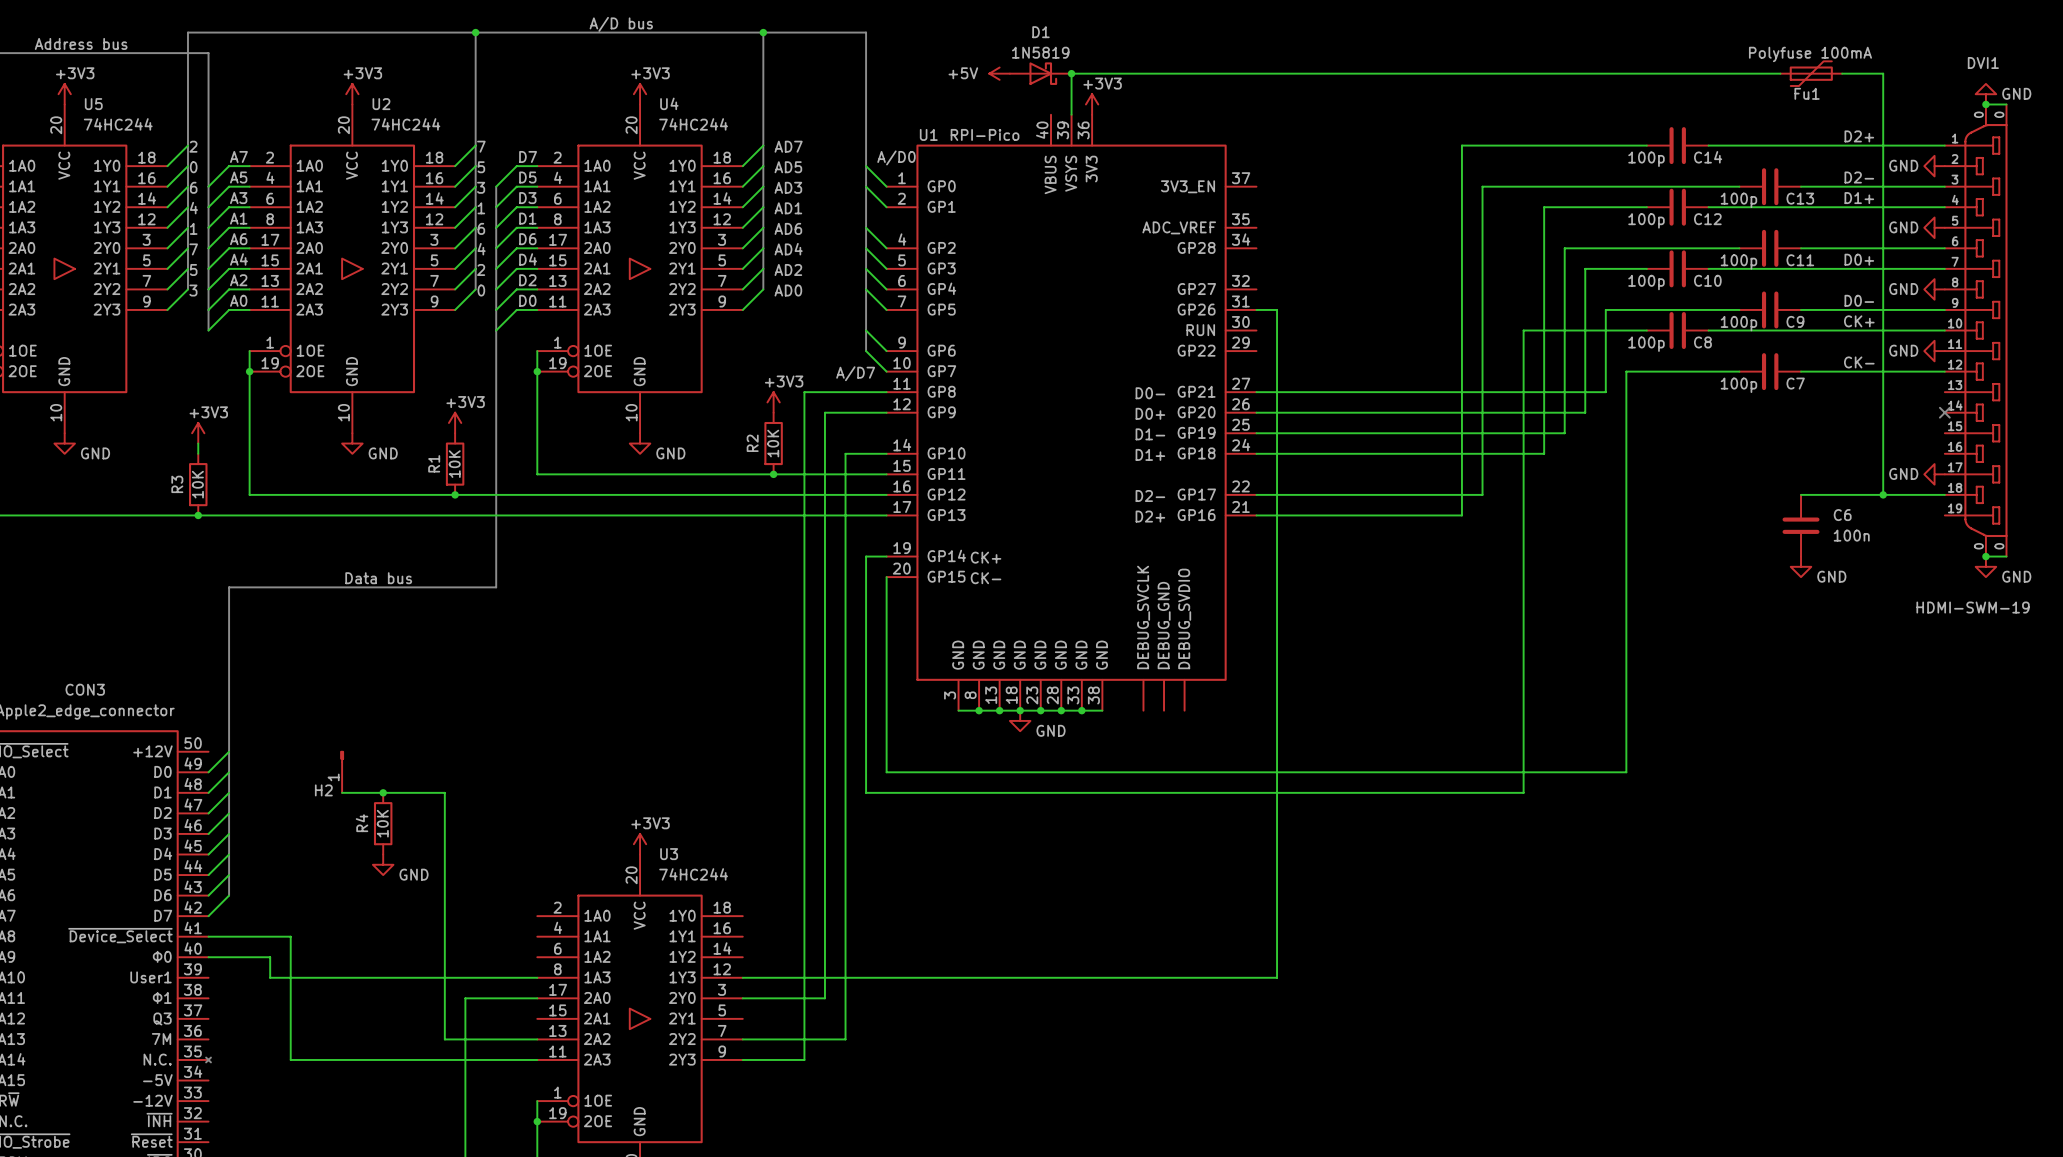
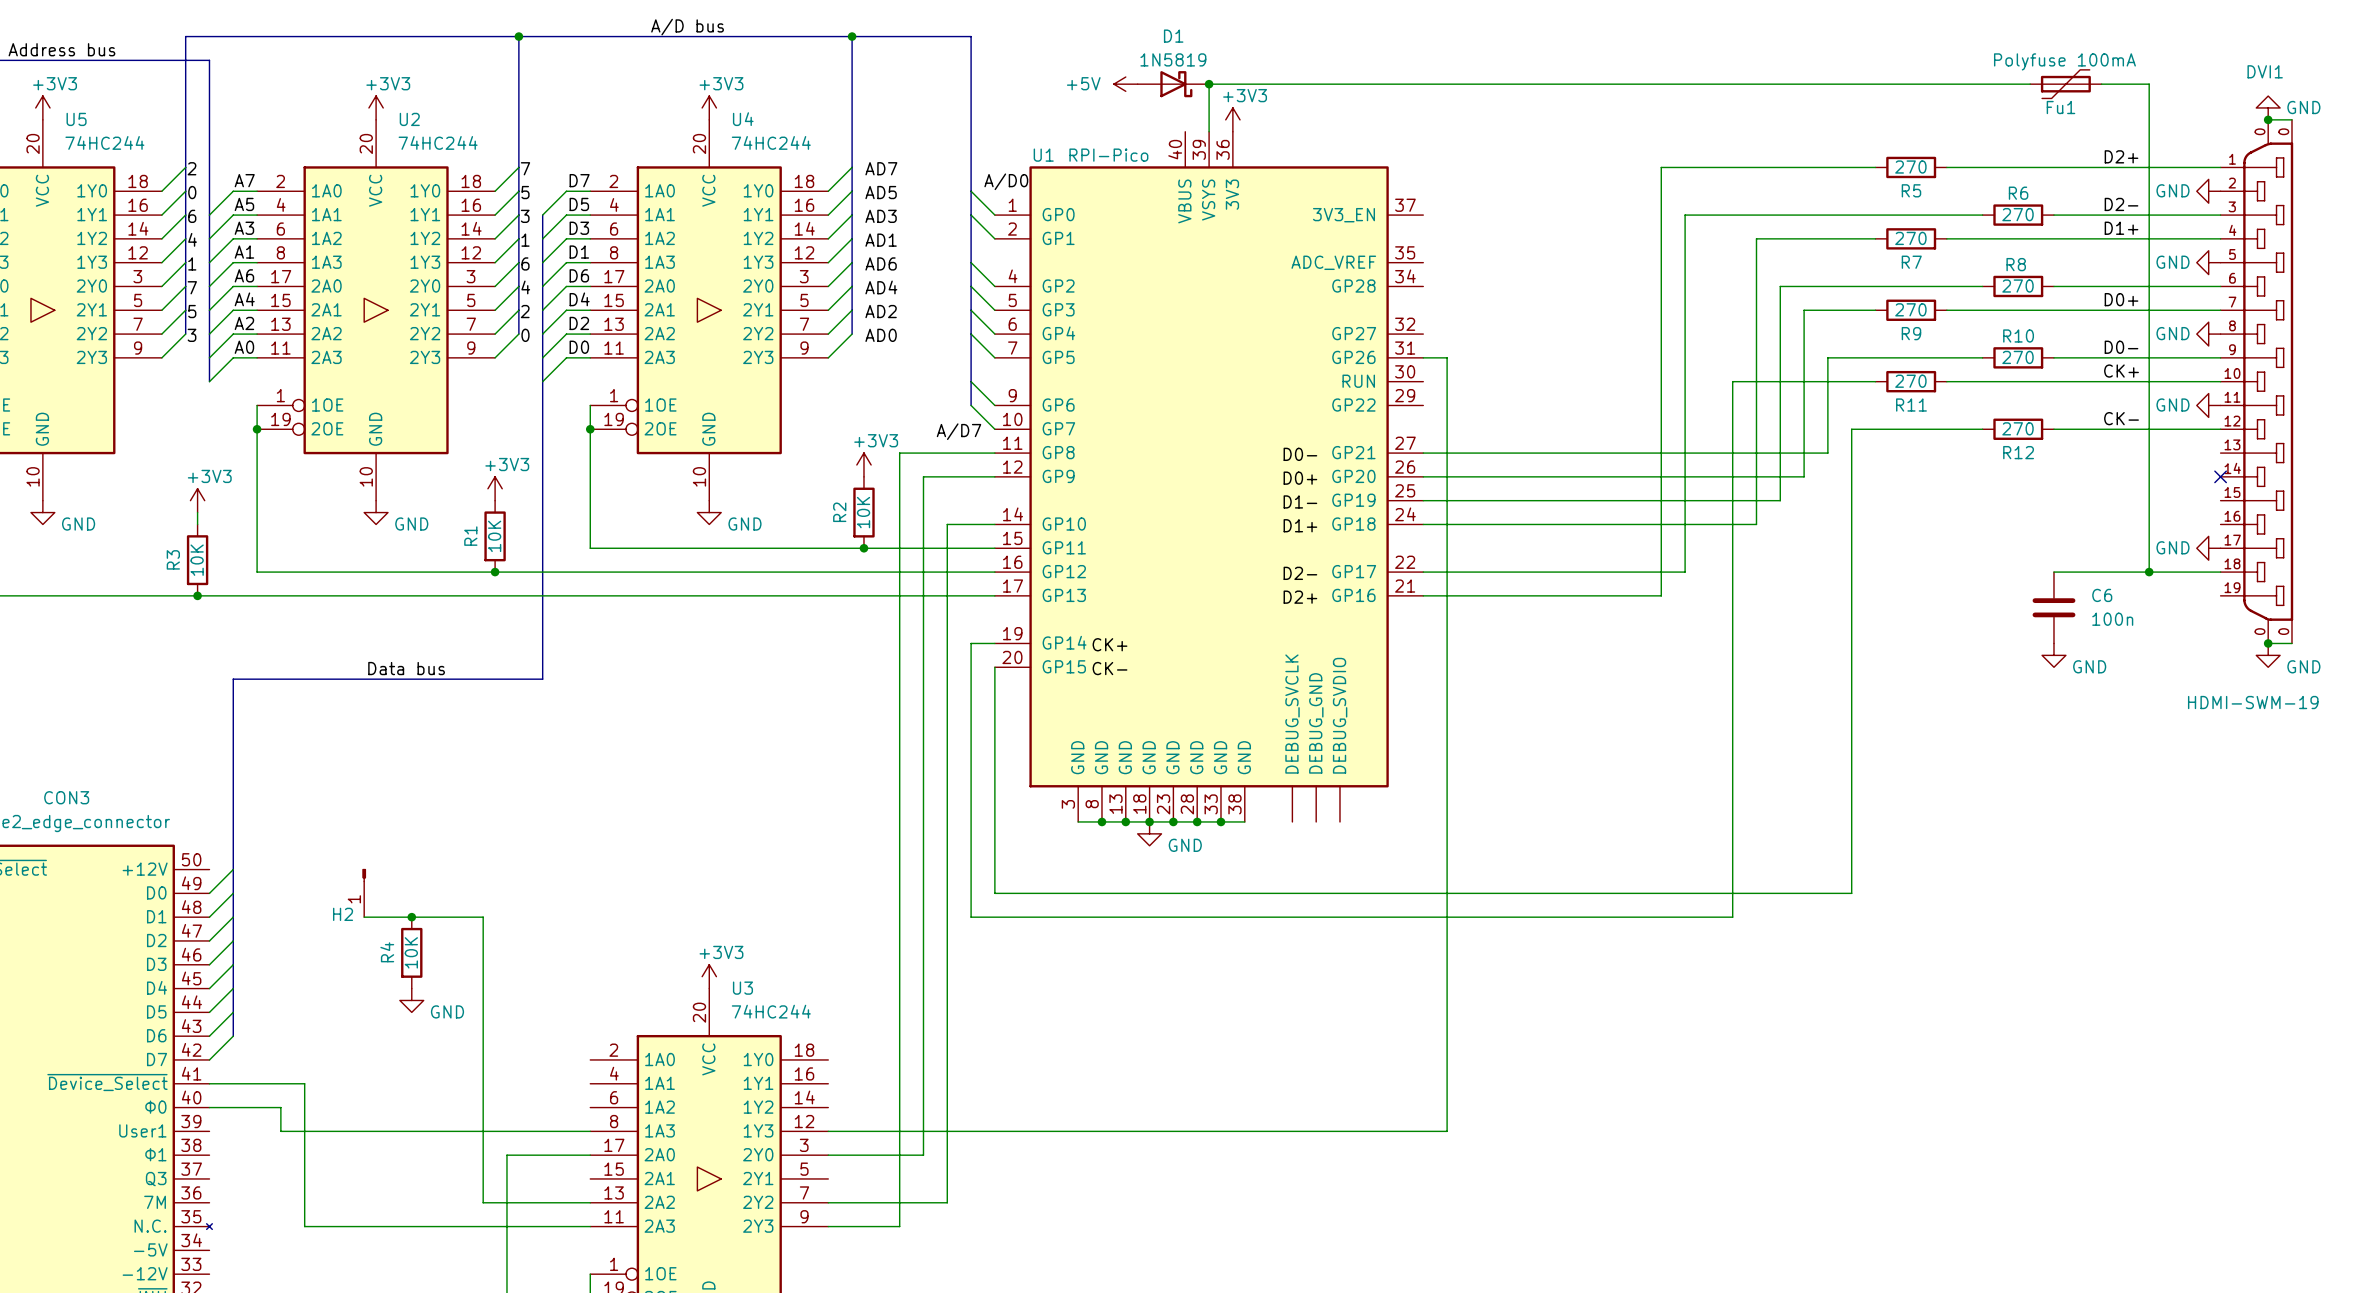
C14: 100p (1677, 145) -> none
R5: none -> 270 (1911, 167)
C13: 100p (1770, 186) -> none
R6: none -> 270 (2018, 215)
C12: 100p (1677, 207) -> none
R7: none -> 270 (1911, 238)
C11: 100p (1770, 248) -> none
R8: none -> 270 (2018, 286)
C10: 100p (1677, 268) -> none
R9: none -> 270 (1911, 310)
C9: 100p (1770, 309) -> none
R10: none -> 270 (2018, 357)
C8: 100p (1677, 330) -> none
R11: none -> 270 (1911, 381)
C7: 100p (1770, 371) -> none
R12: none -> 270 (2018, 429)

